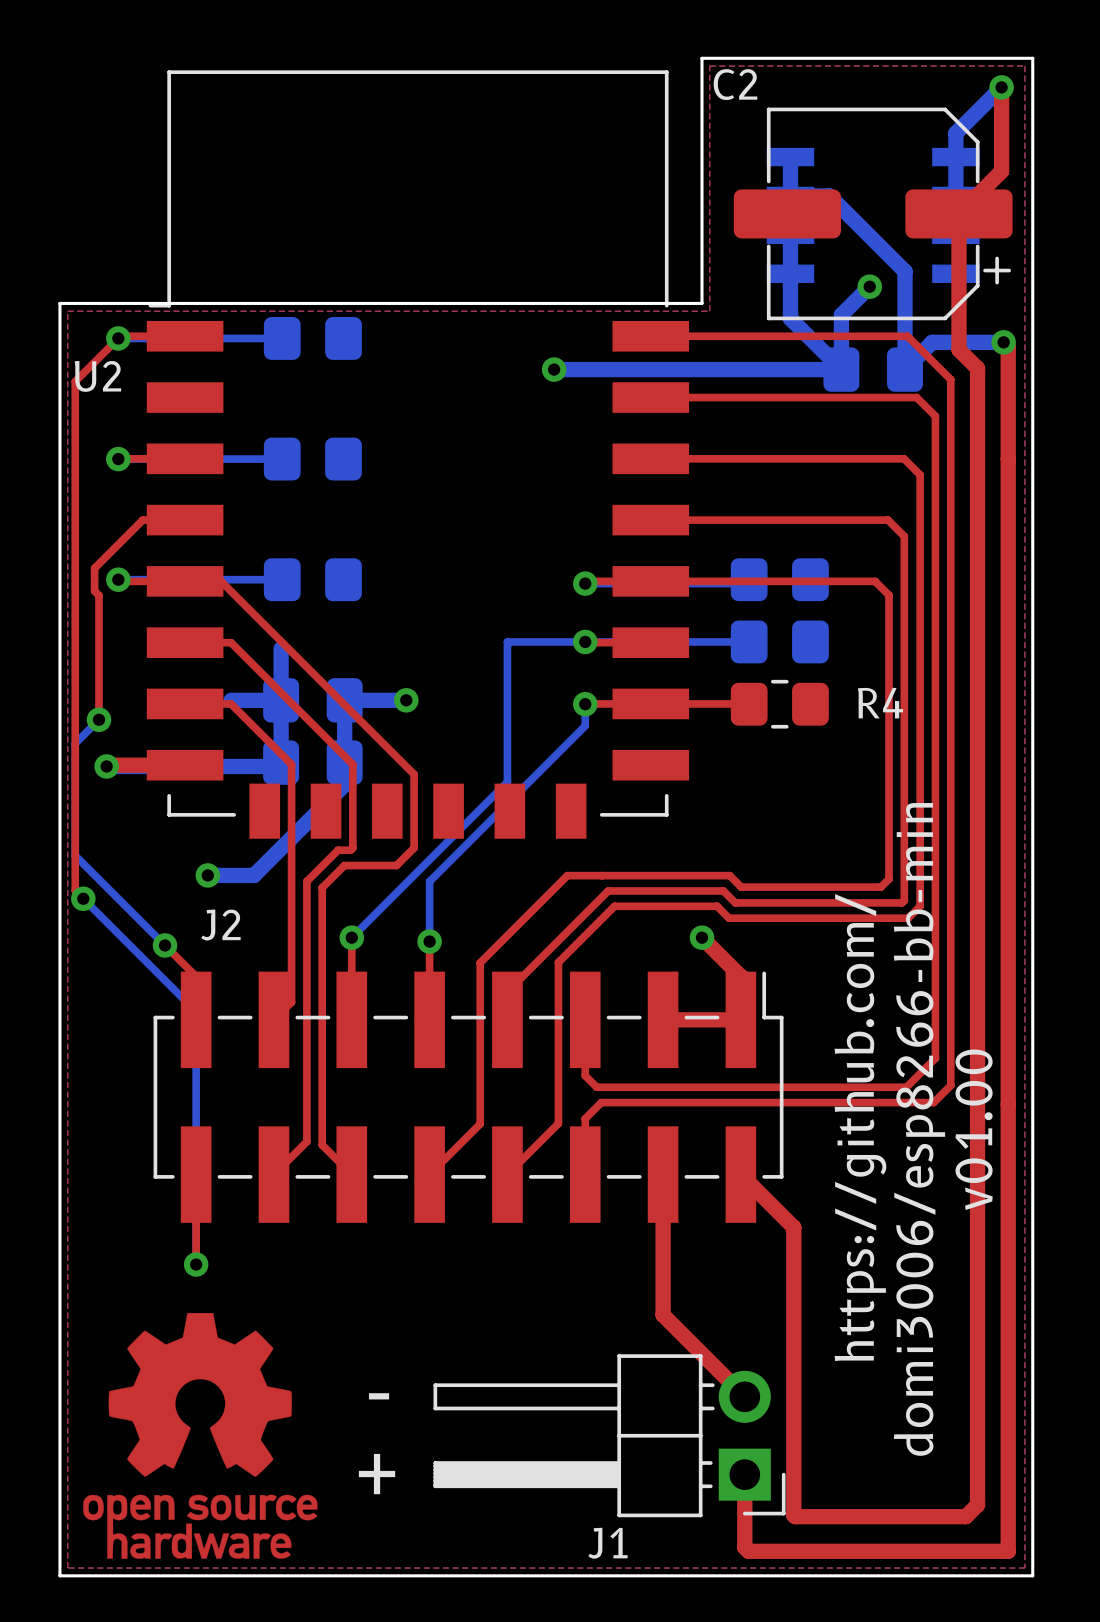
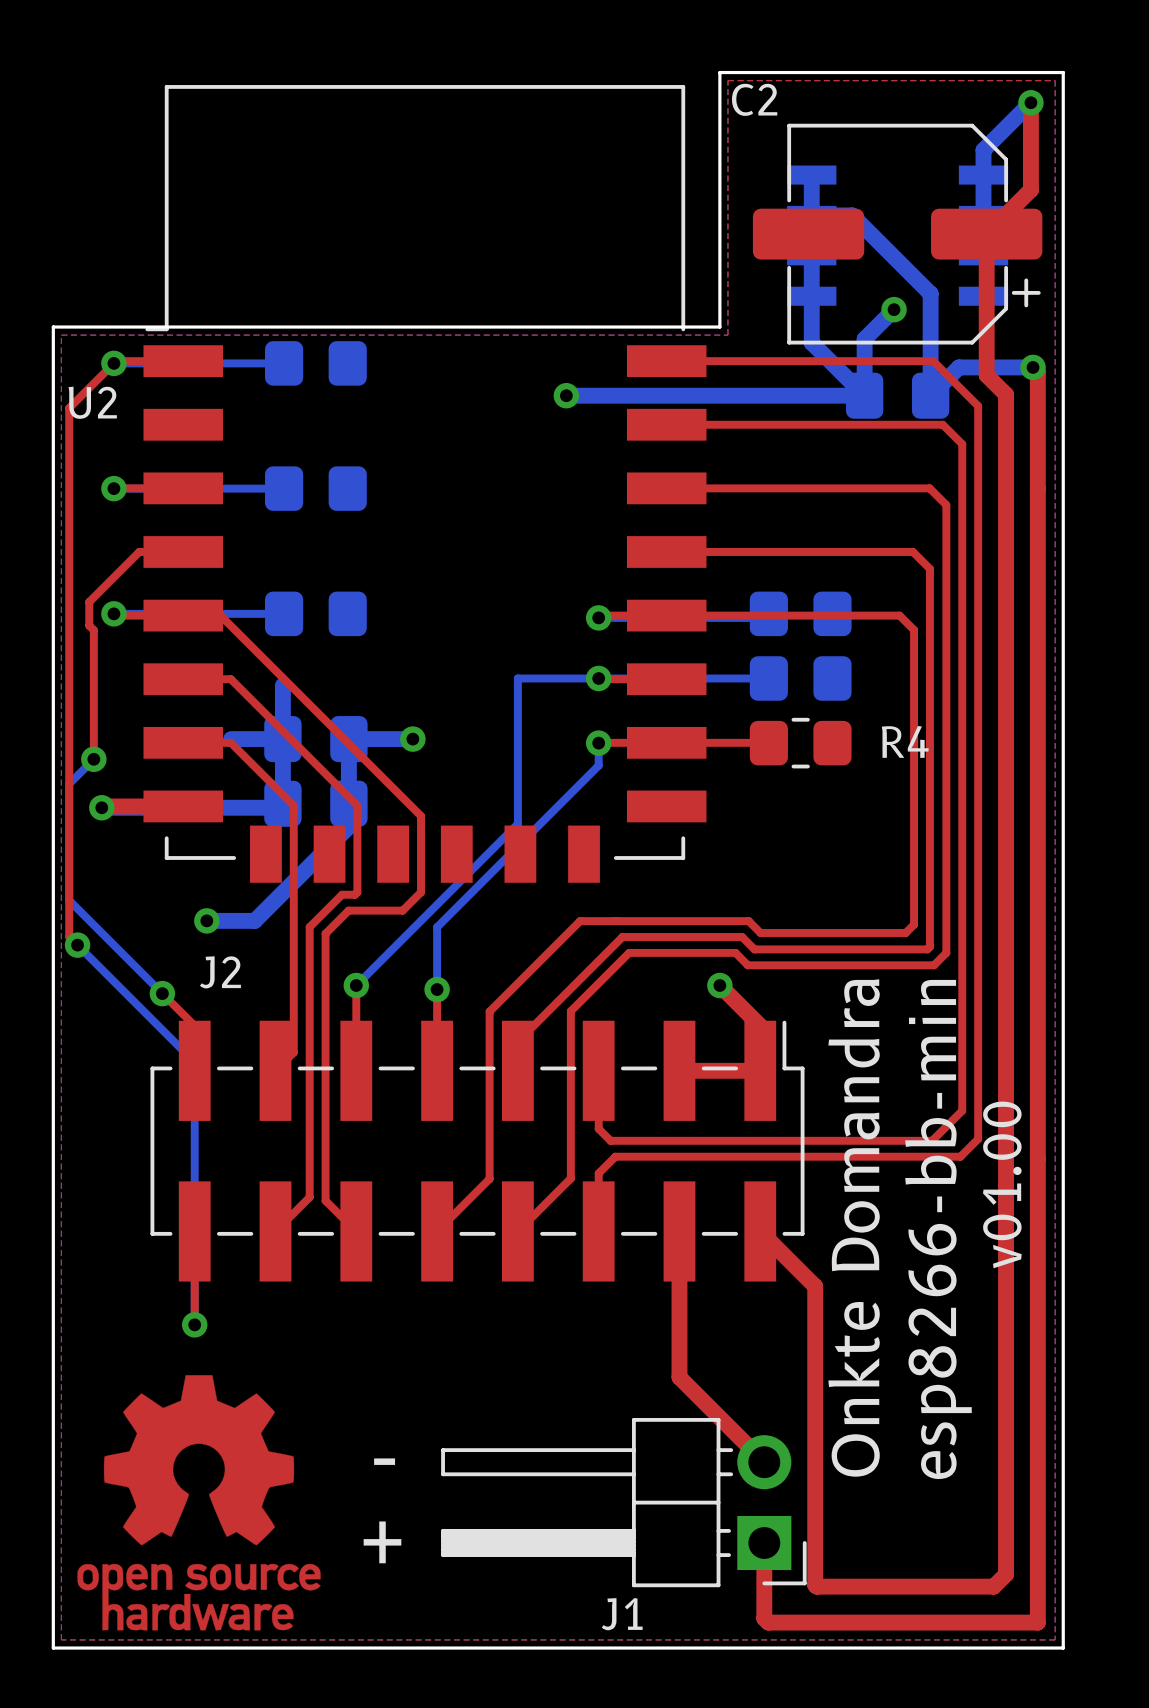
text: https://github.com/ (860, 1127) -> none
text: domi3006/esp8266-bb-min (919, 1129) -> esp8266-bb-min (938, 1229)
text: none -> Onkte Domandra (854, 1227)

